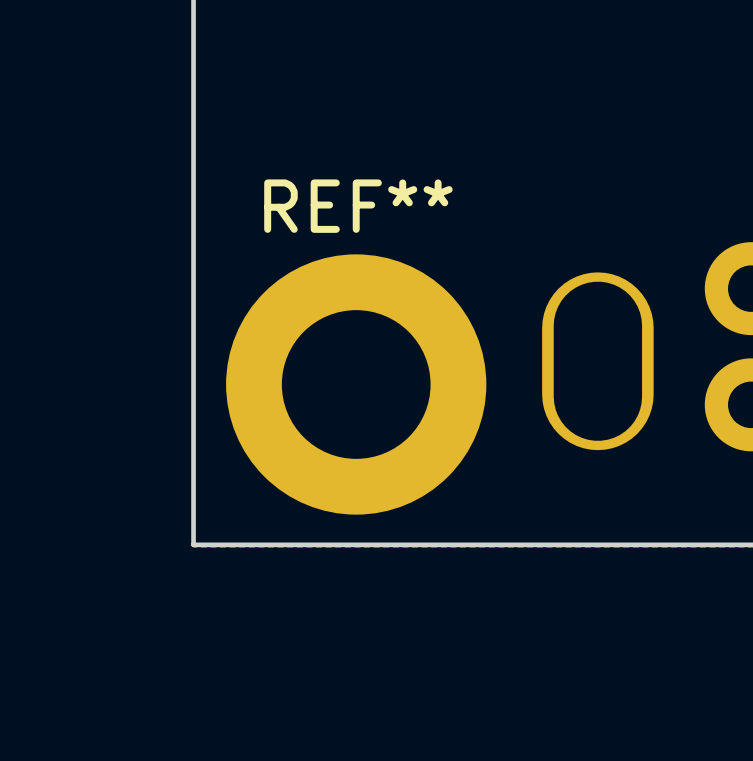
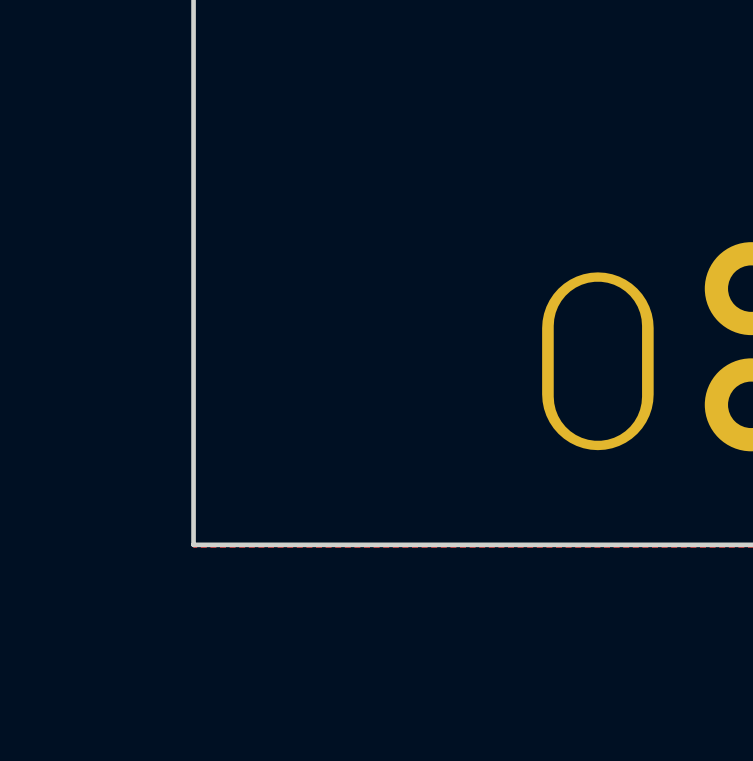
REF**: (356, 384) -> none

